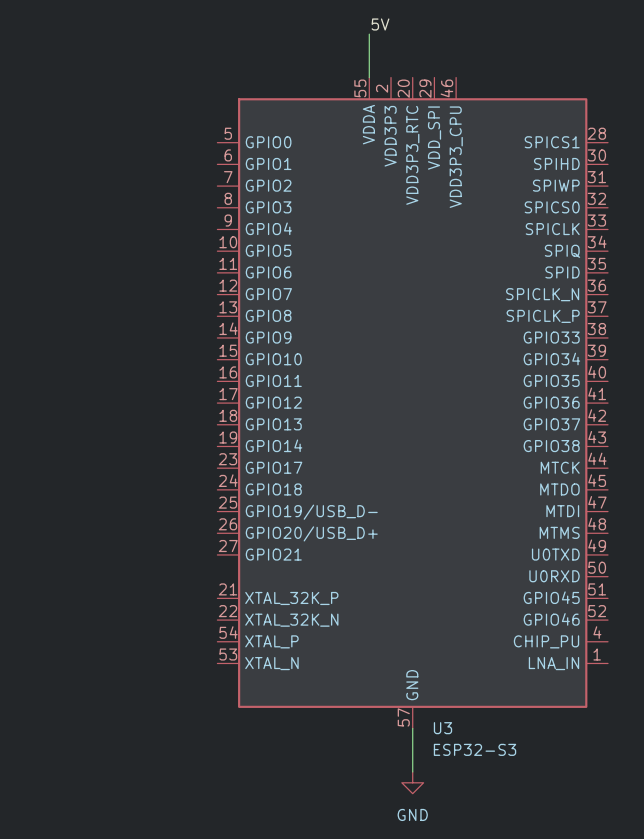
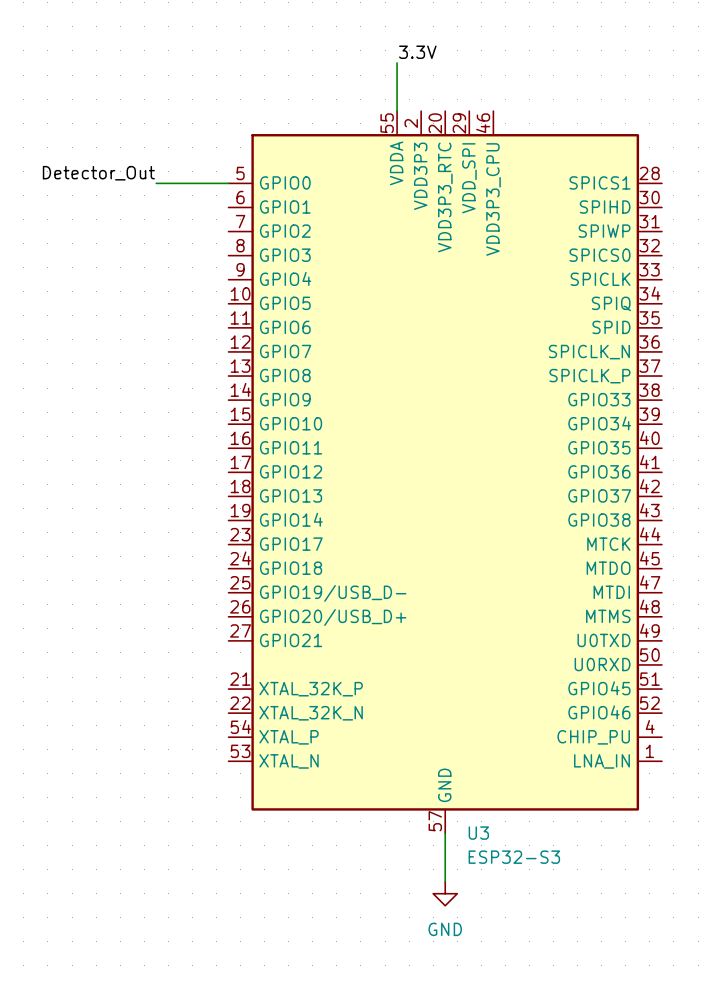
label: 5V (380, 24) -> 3.3V (417, 52)
label: none -> Detector_Out (98, 173)
wire: none -> (156, 183) (228, 183)

